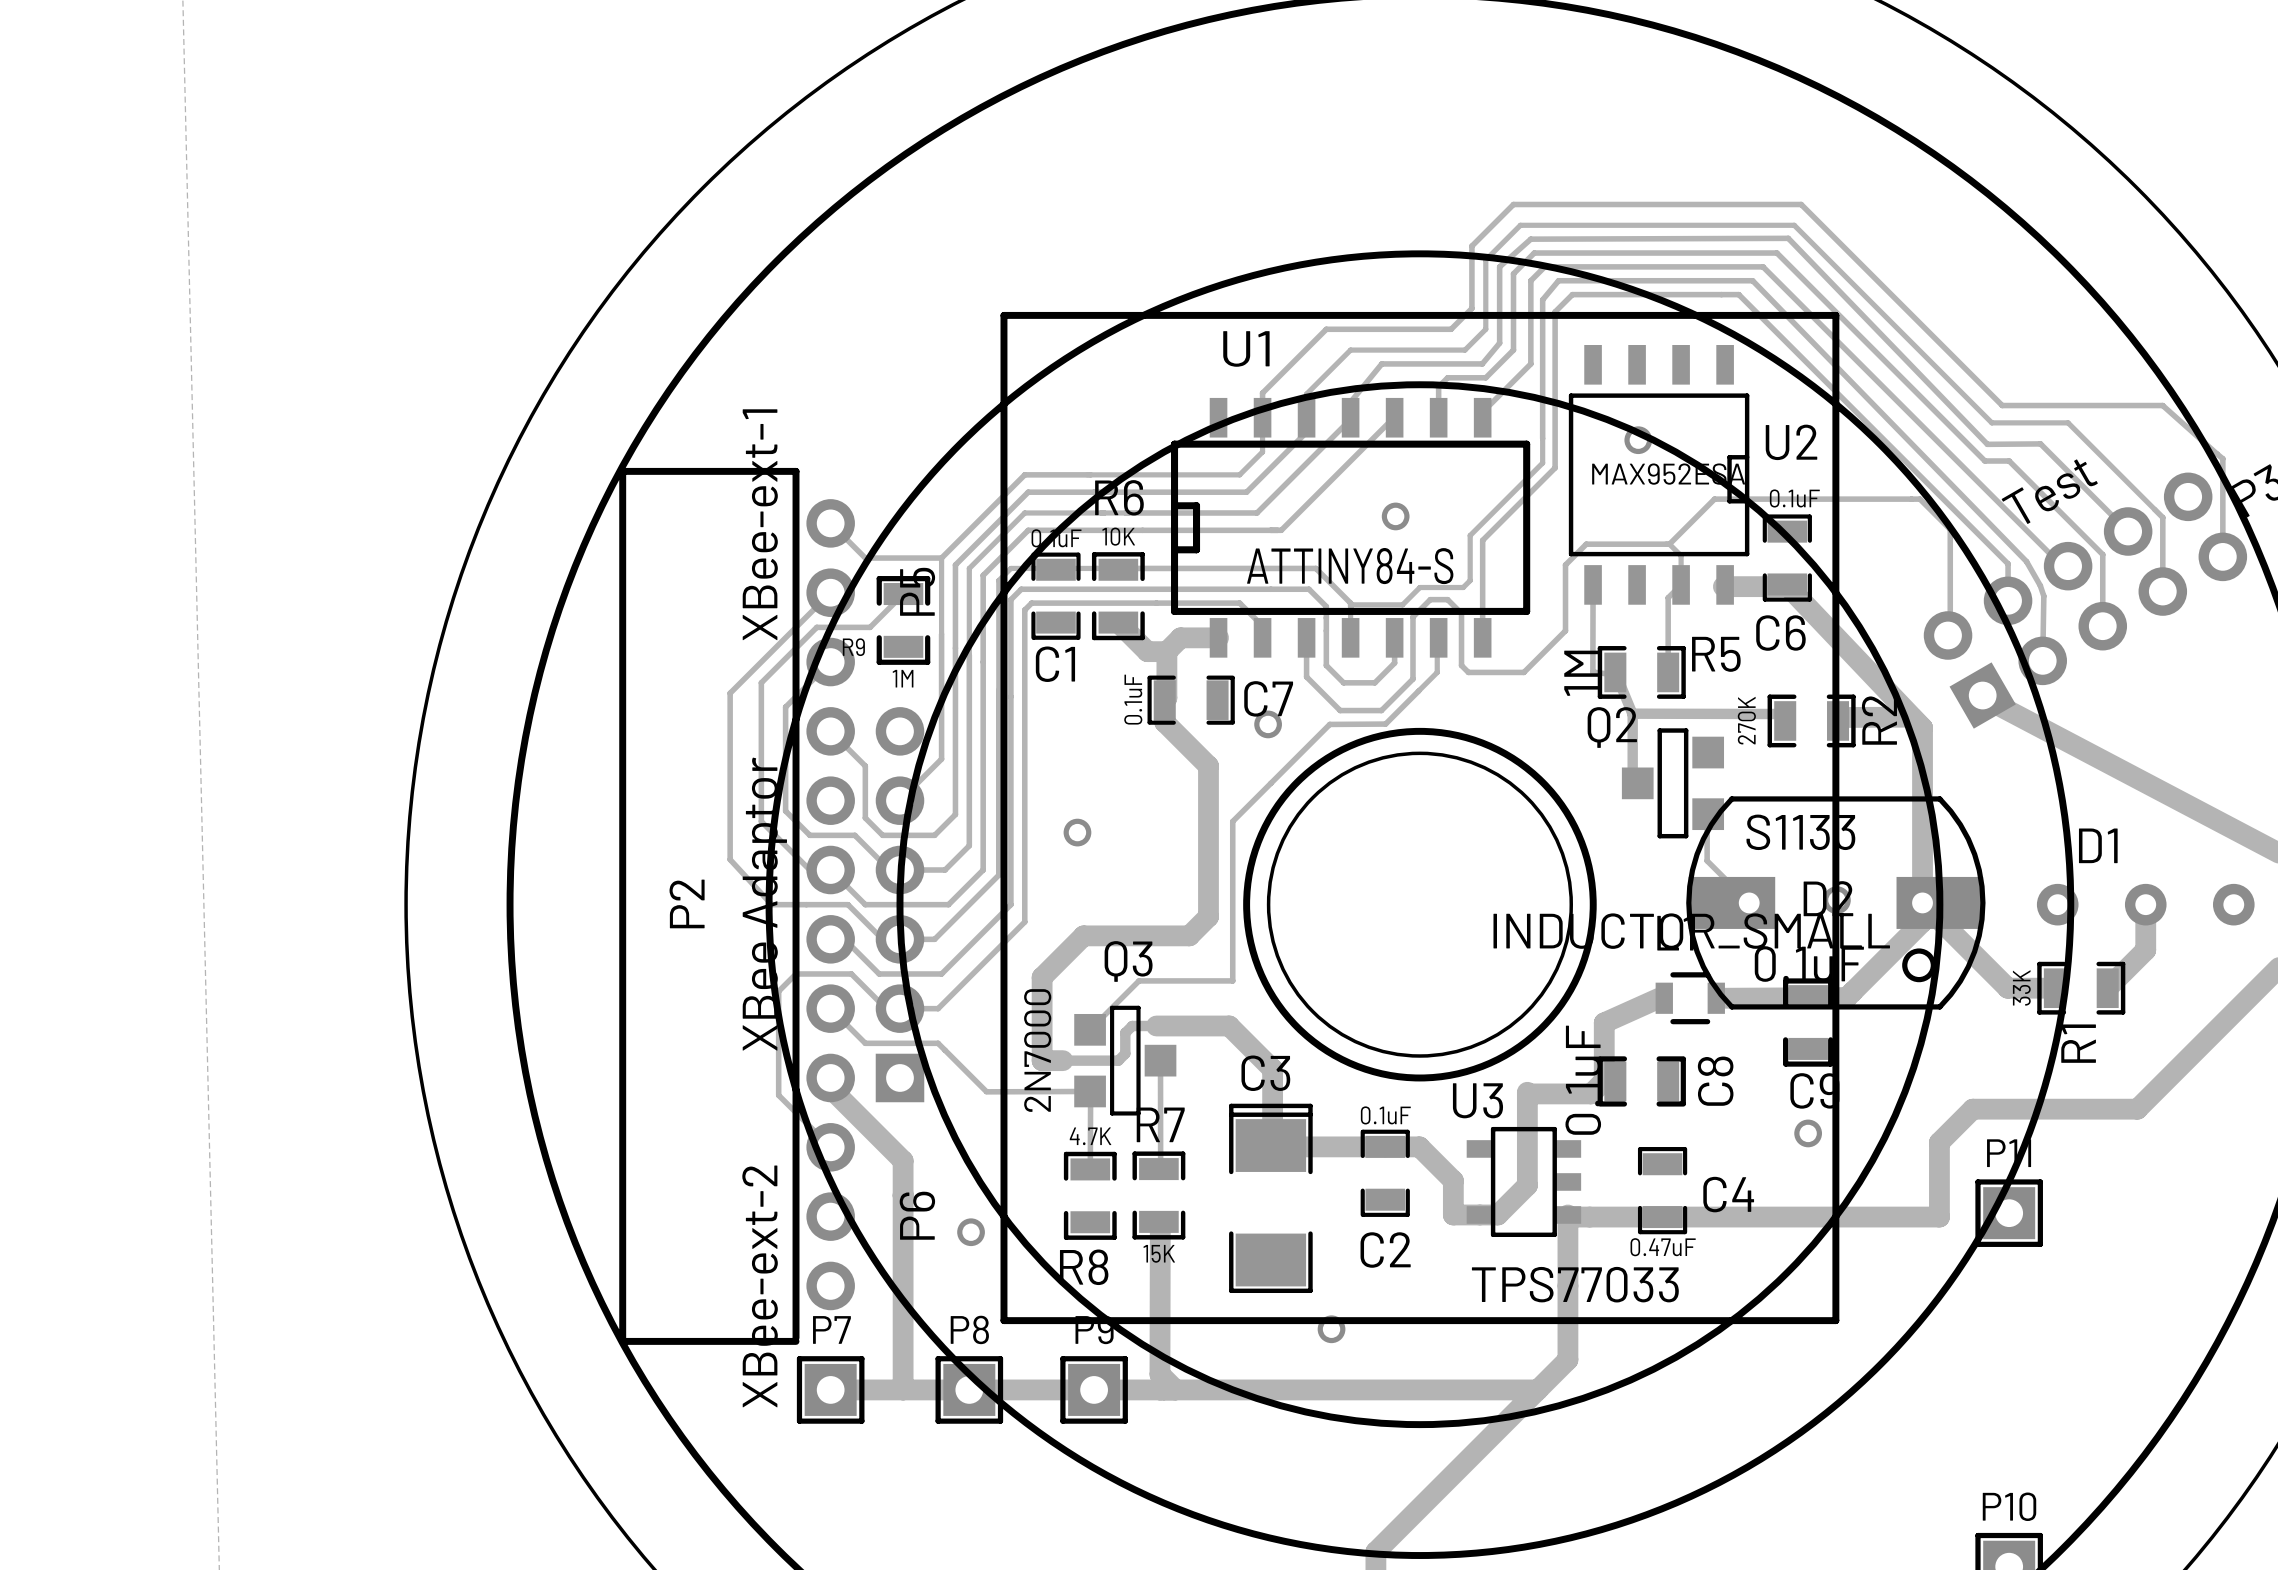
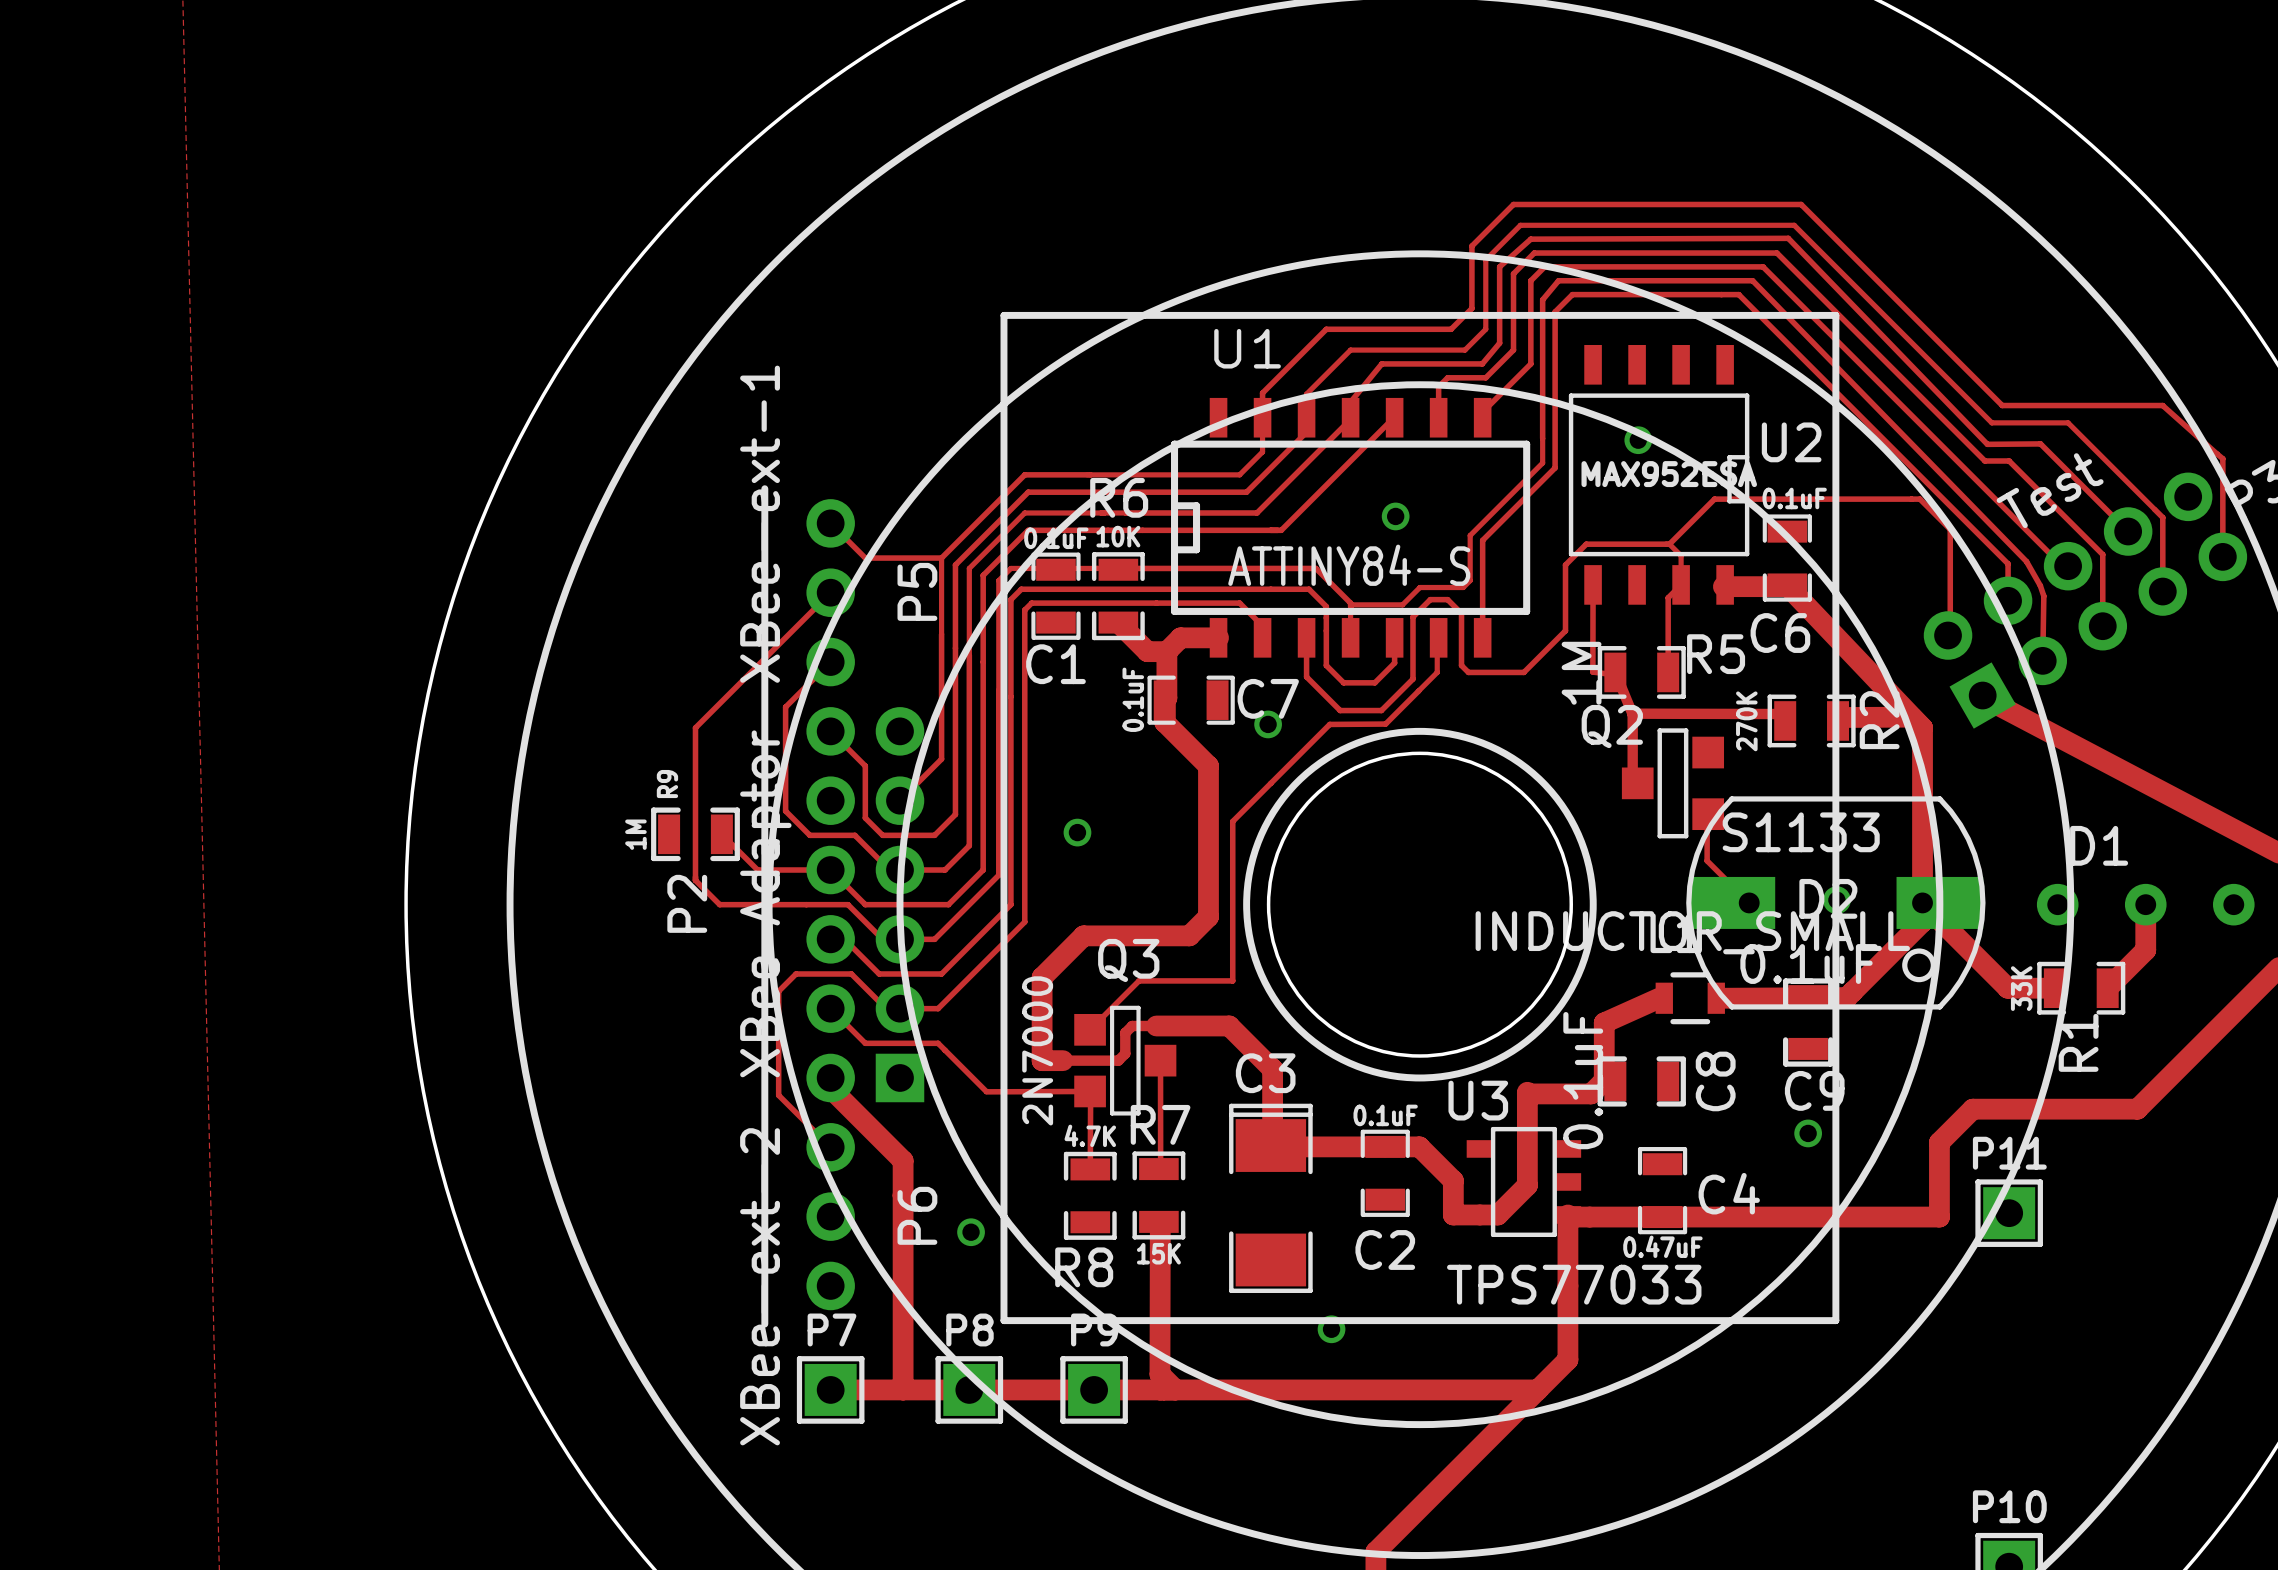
line: none -> (764, 488) (764, 1324)
track: (903, 594) (870, 627) (816, 627) (761, 682) (761, 821) (809, 870) -> (721, 834) (757, 870) (809, 870)
R9 rotation: 0° (903, 620) -> 90° clockwise (695, 834)
R9 position: (903, 620) -> (695, 834)
track: (730, 693) (730, 859) (771, 904) -> (730, 693) (695, 727) (695, 880) (719, 904) (771, 904)
line: (622, 1337) (622, 471) (796, 471) (796, 1337) -> none
line: (622, 1341) (796, 1341) -> none

